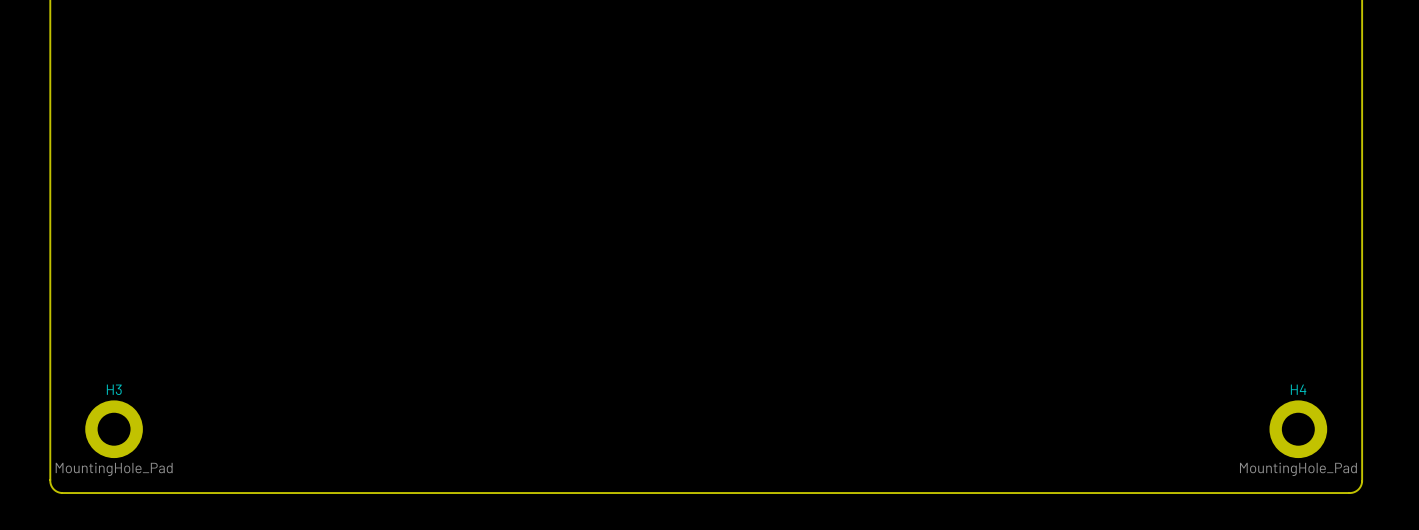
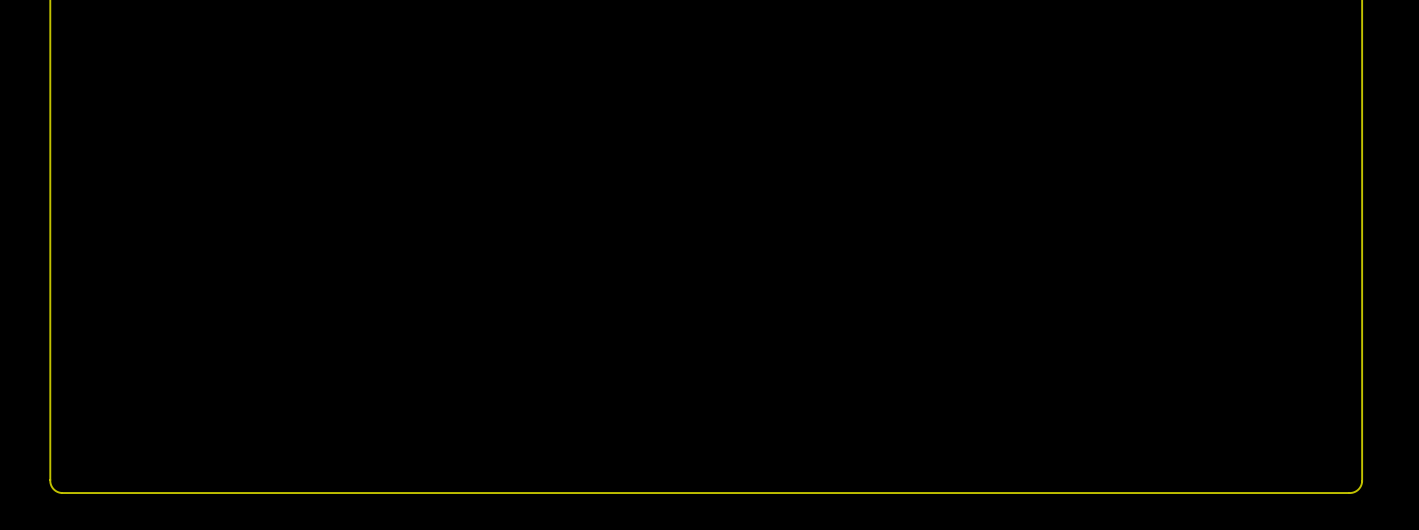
H3: MountingHole_Pad (114, 429) -> none
H4: MountingHole_Pad (1298, 429) -> none

